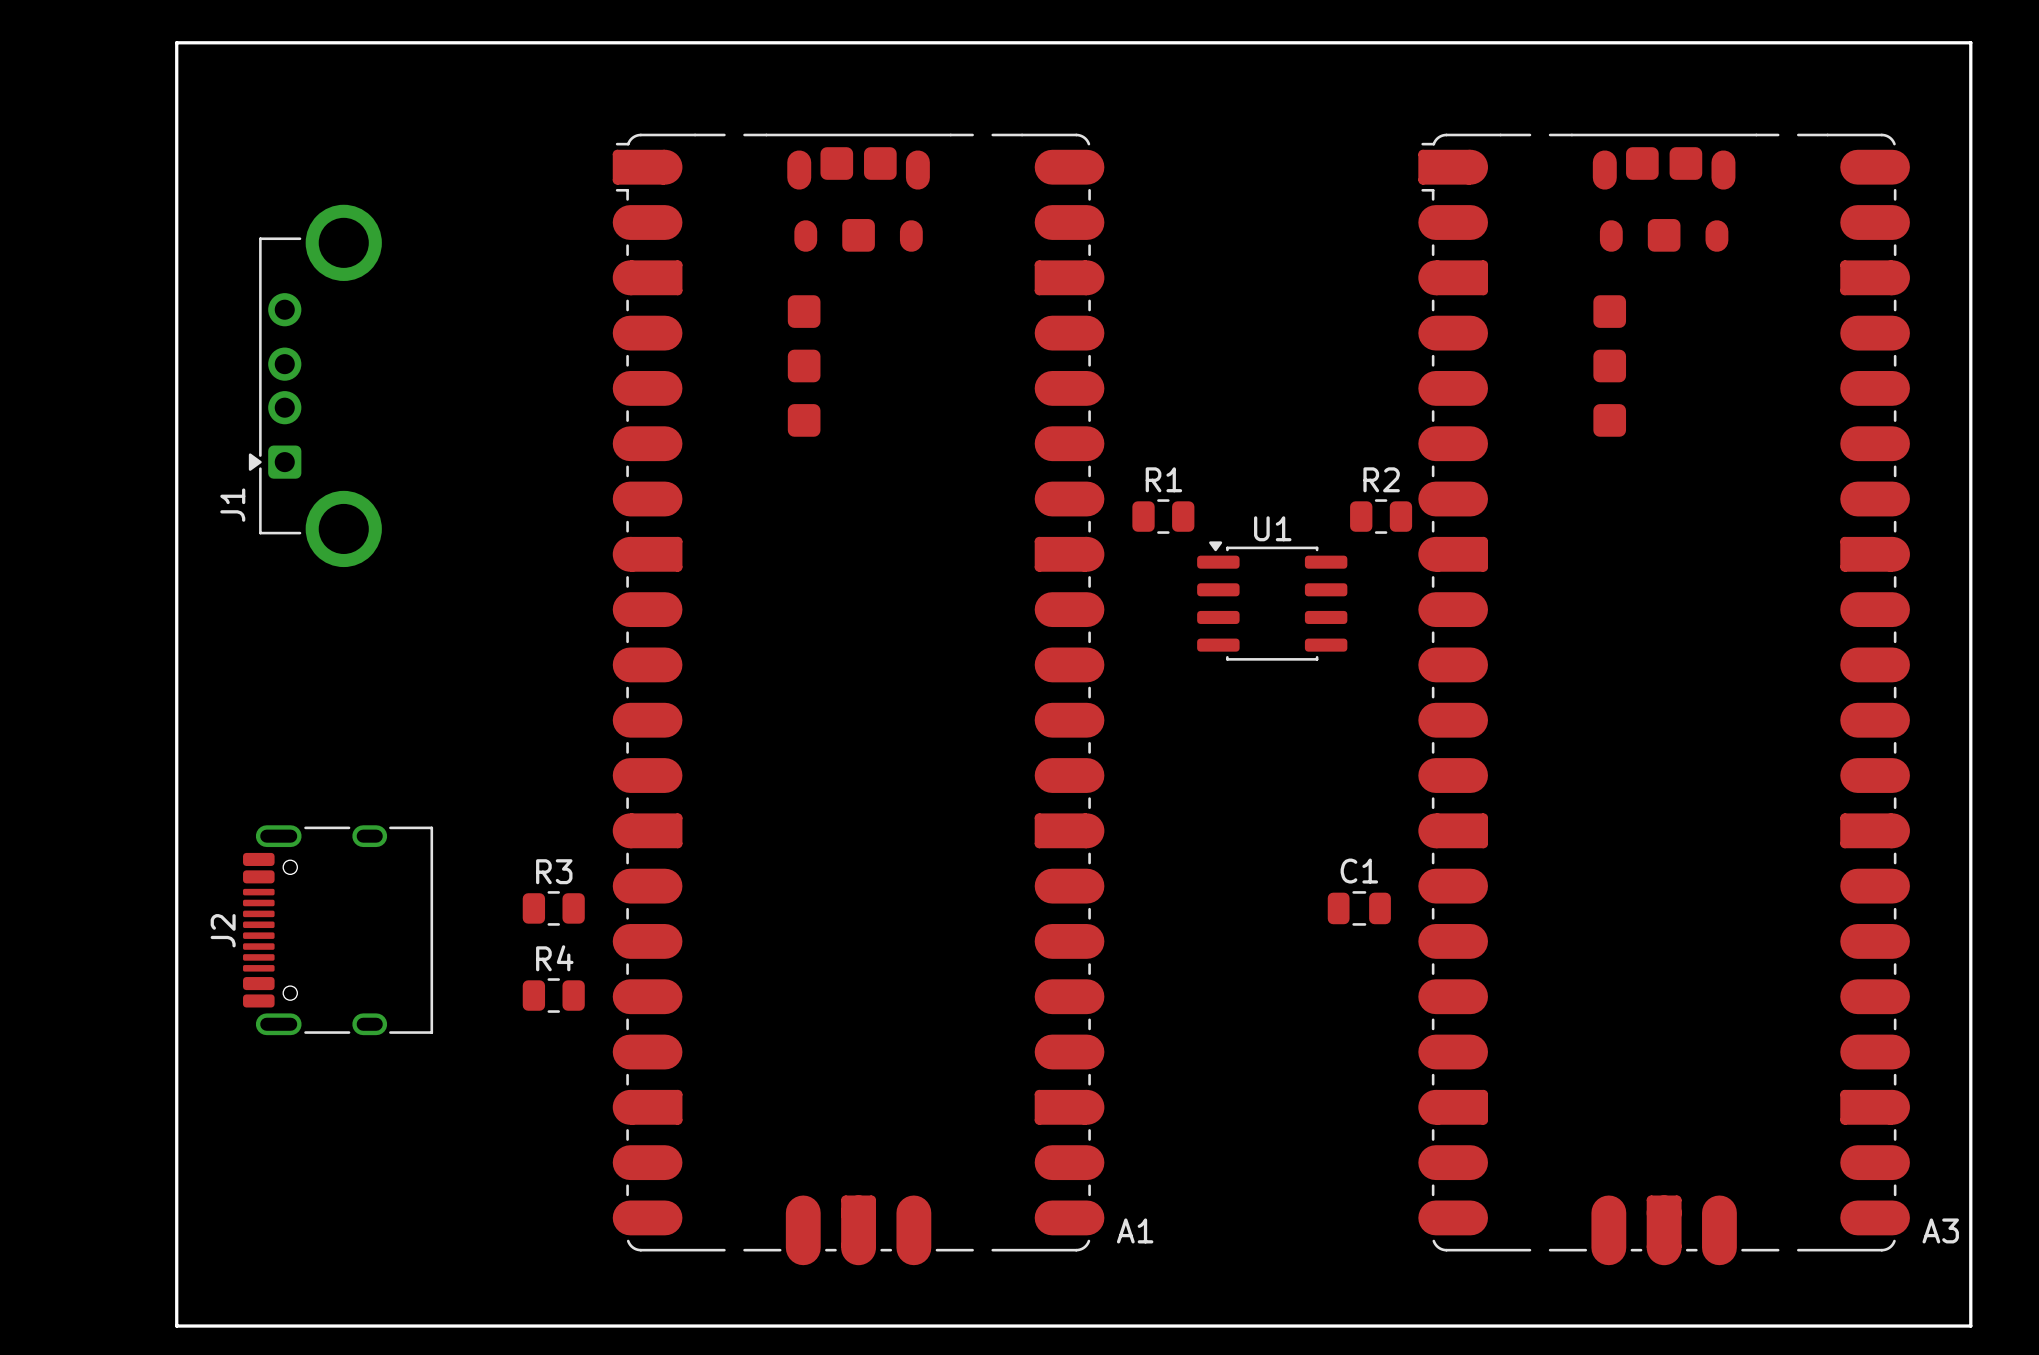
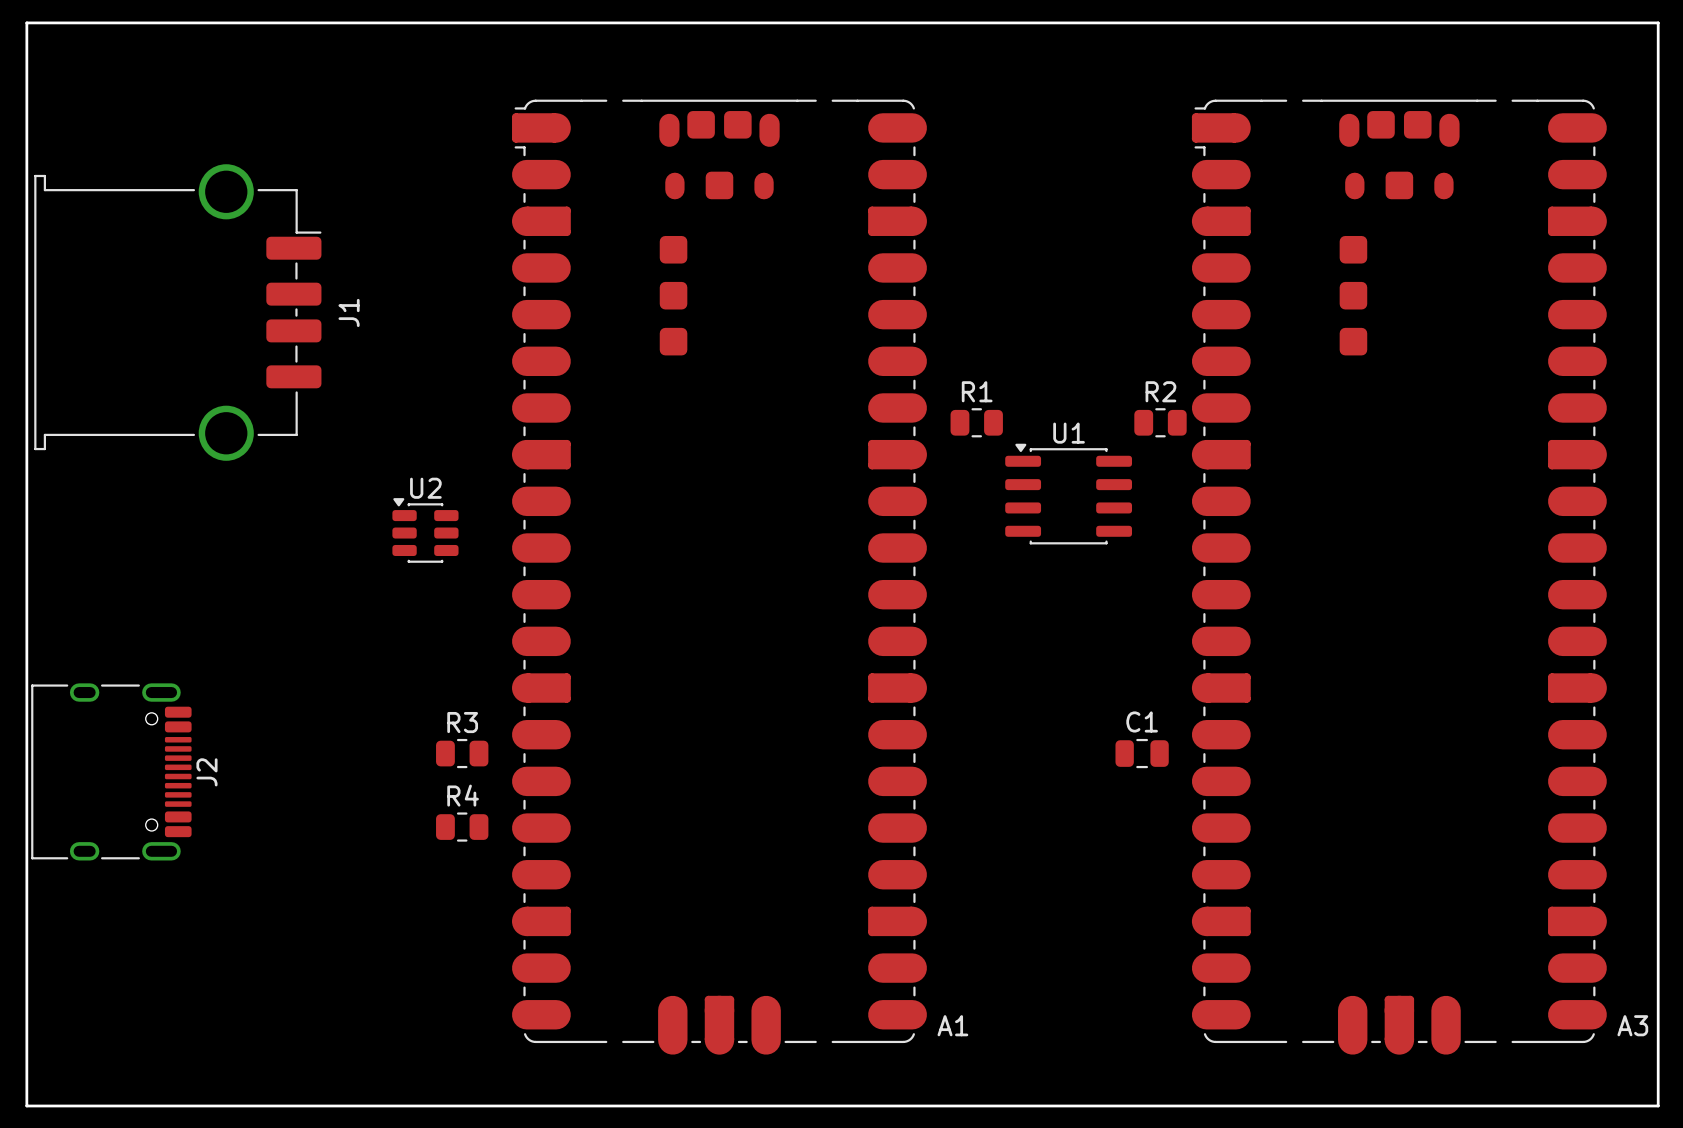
board edge: (176, 42) (176, 1326) -> (143, 22) (26, 22) (26, 1105) (143, 1105)
J1 footprint: [248, 204, 382, 568] -> [34, 164, 322, 461]
J1 name position: J1 (232, 505) -> J1 (349, 312)
U2: none -> (425, 530)
J2 rotation: 0° (338, 930) -> 180° (111, 771)
J2 position: (338, 930) -> (111, 771)

